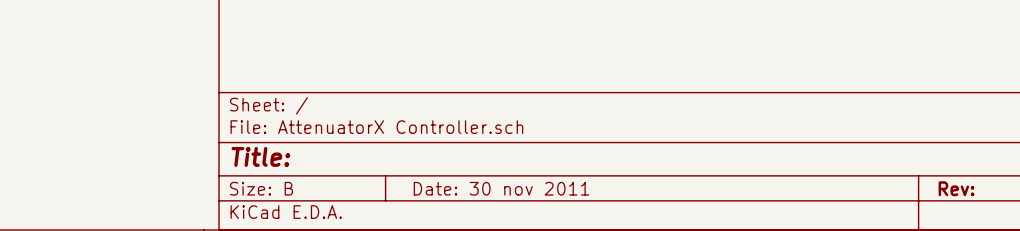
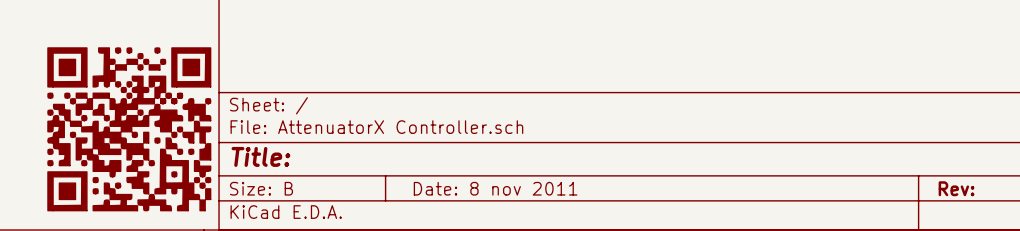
power symbol: none -> (129, 129)
title block: Date: 30 nov 2011 (501, 188) -> Date: 8 nov 2011 (495, 188)

